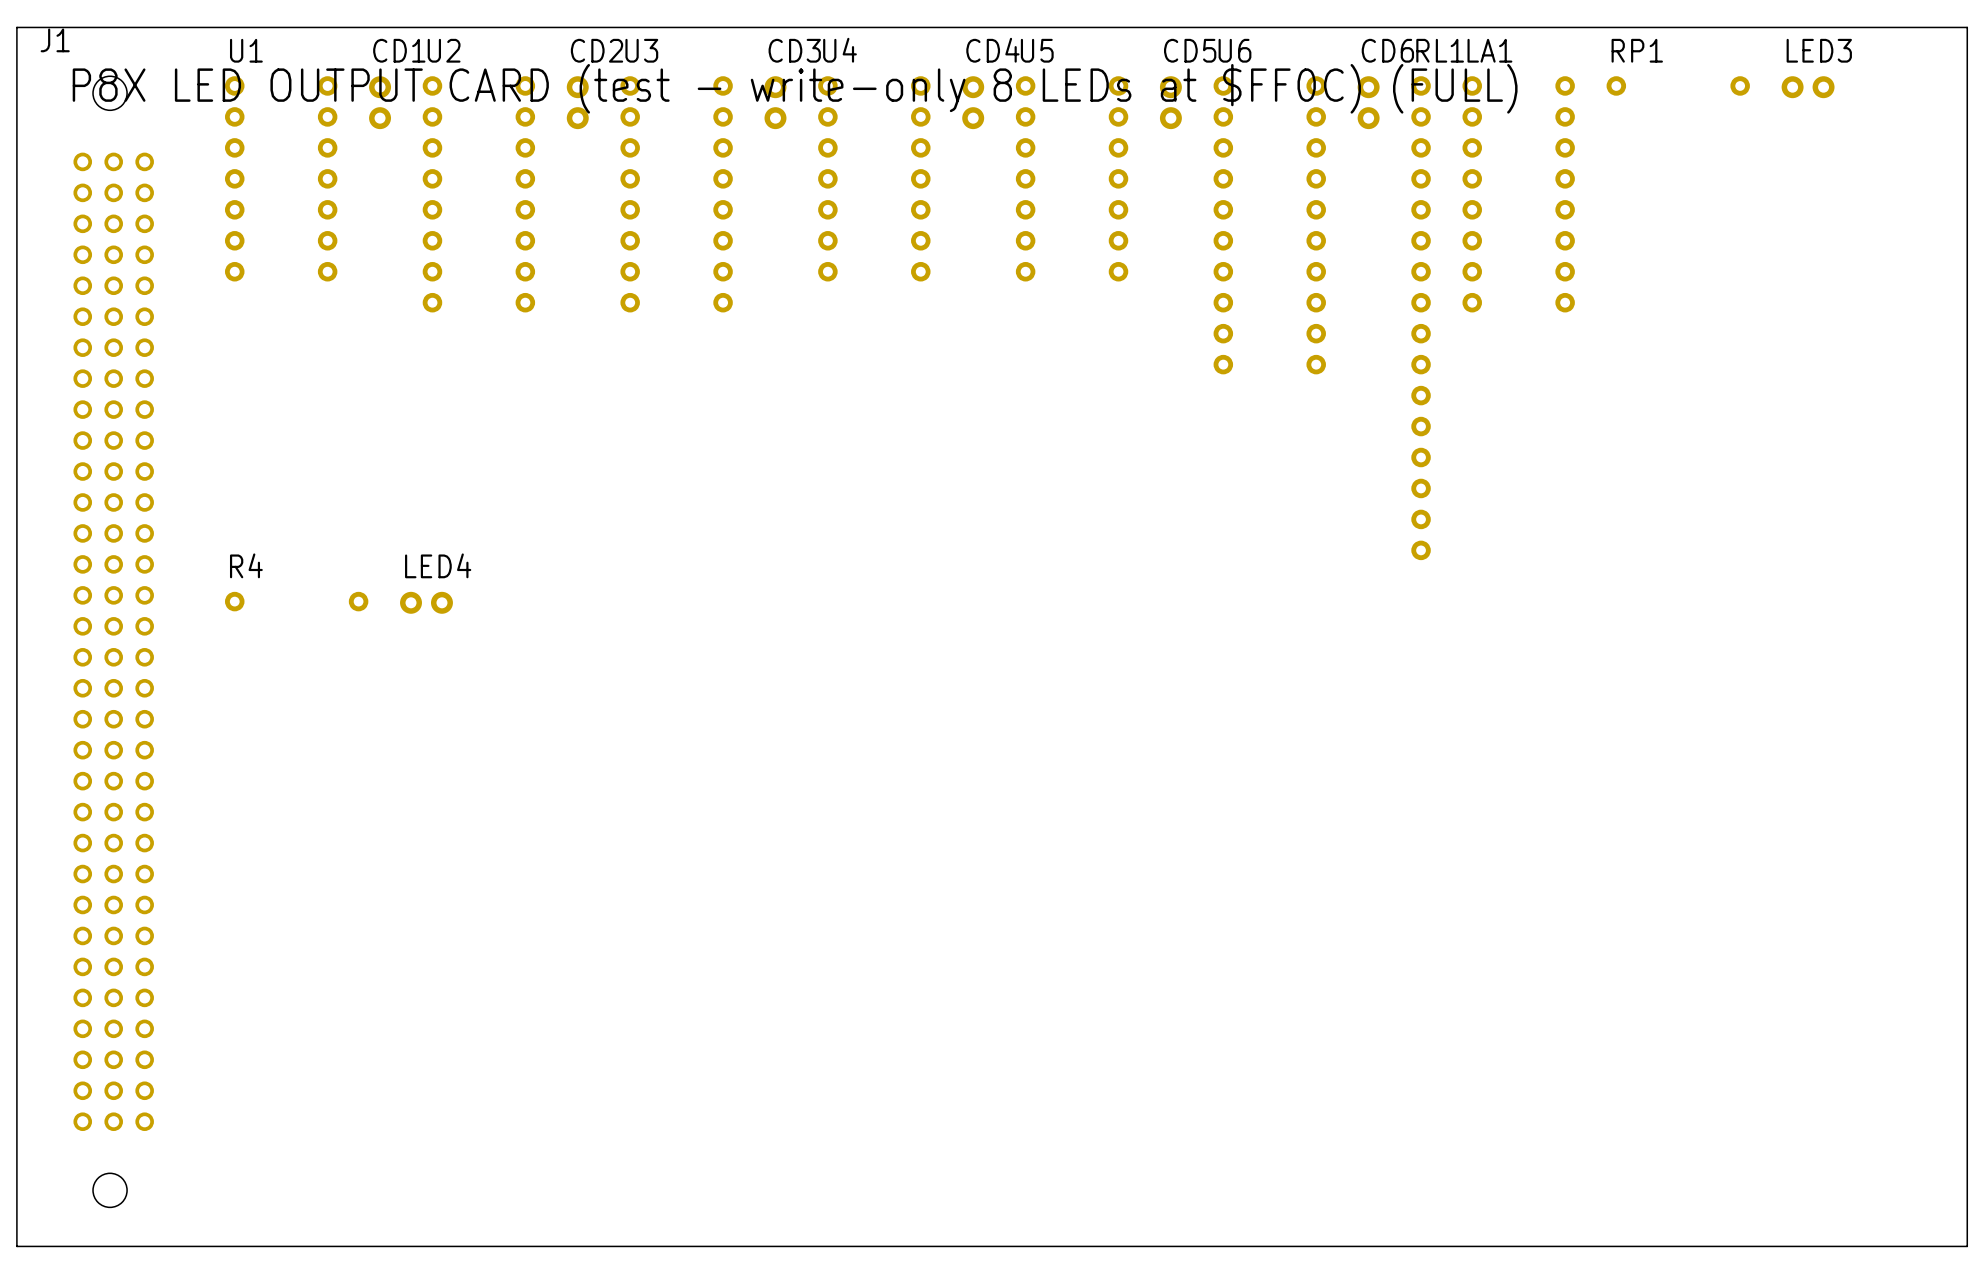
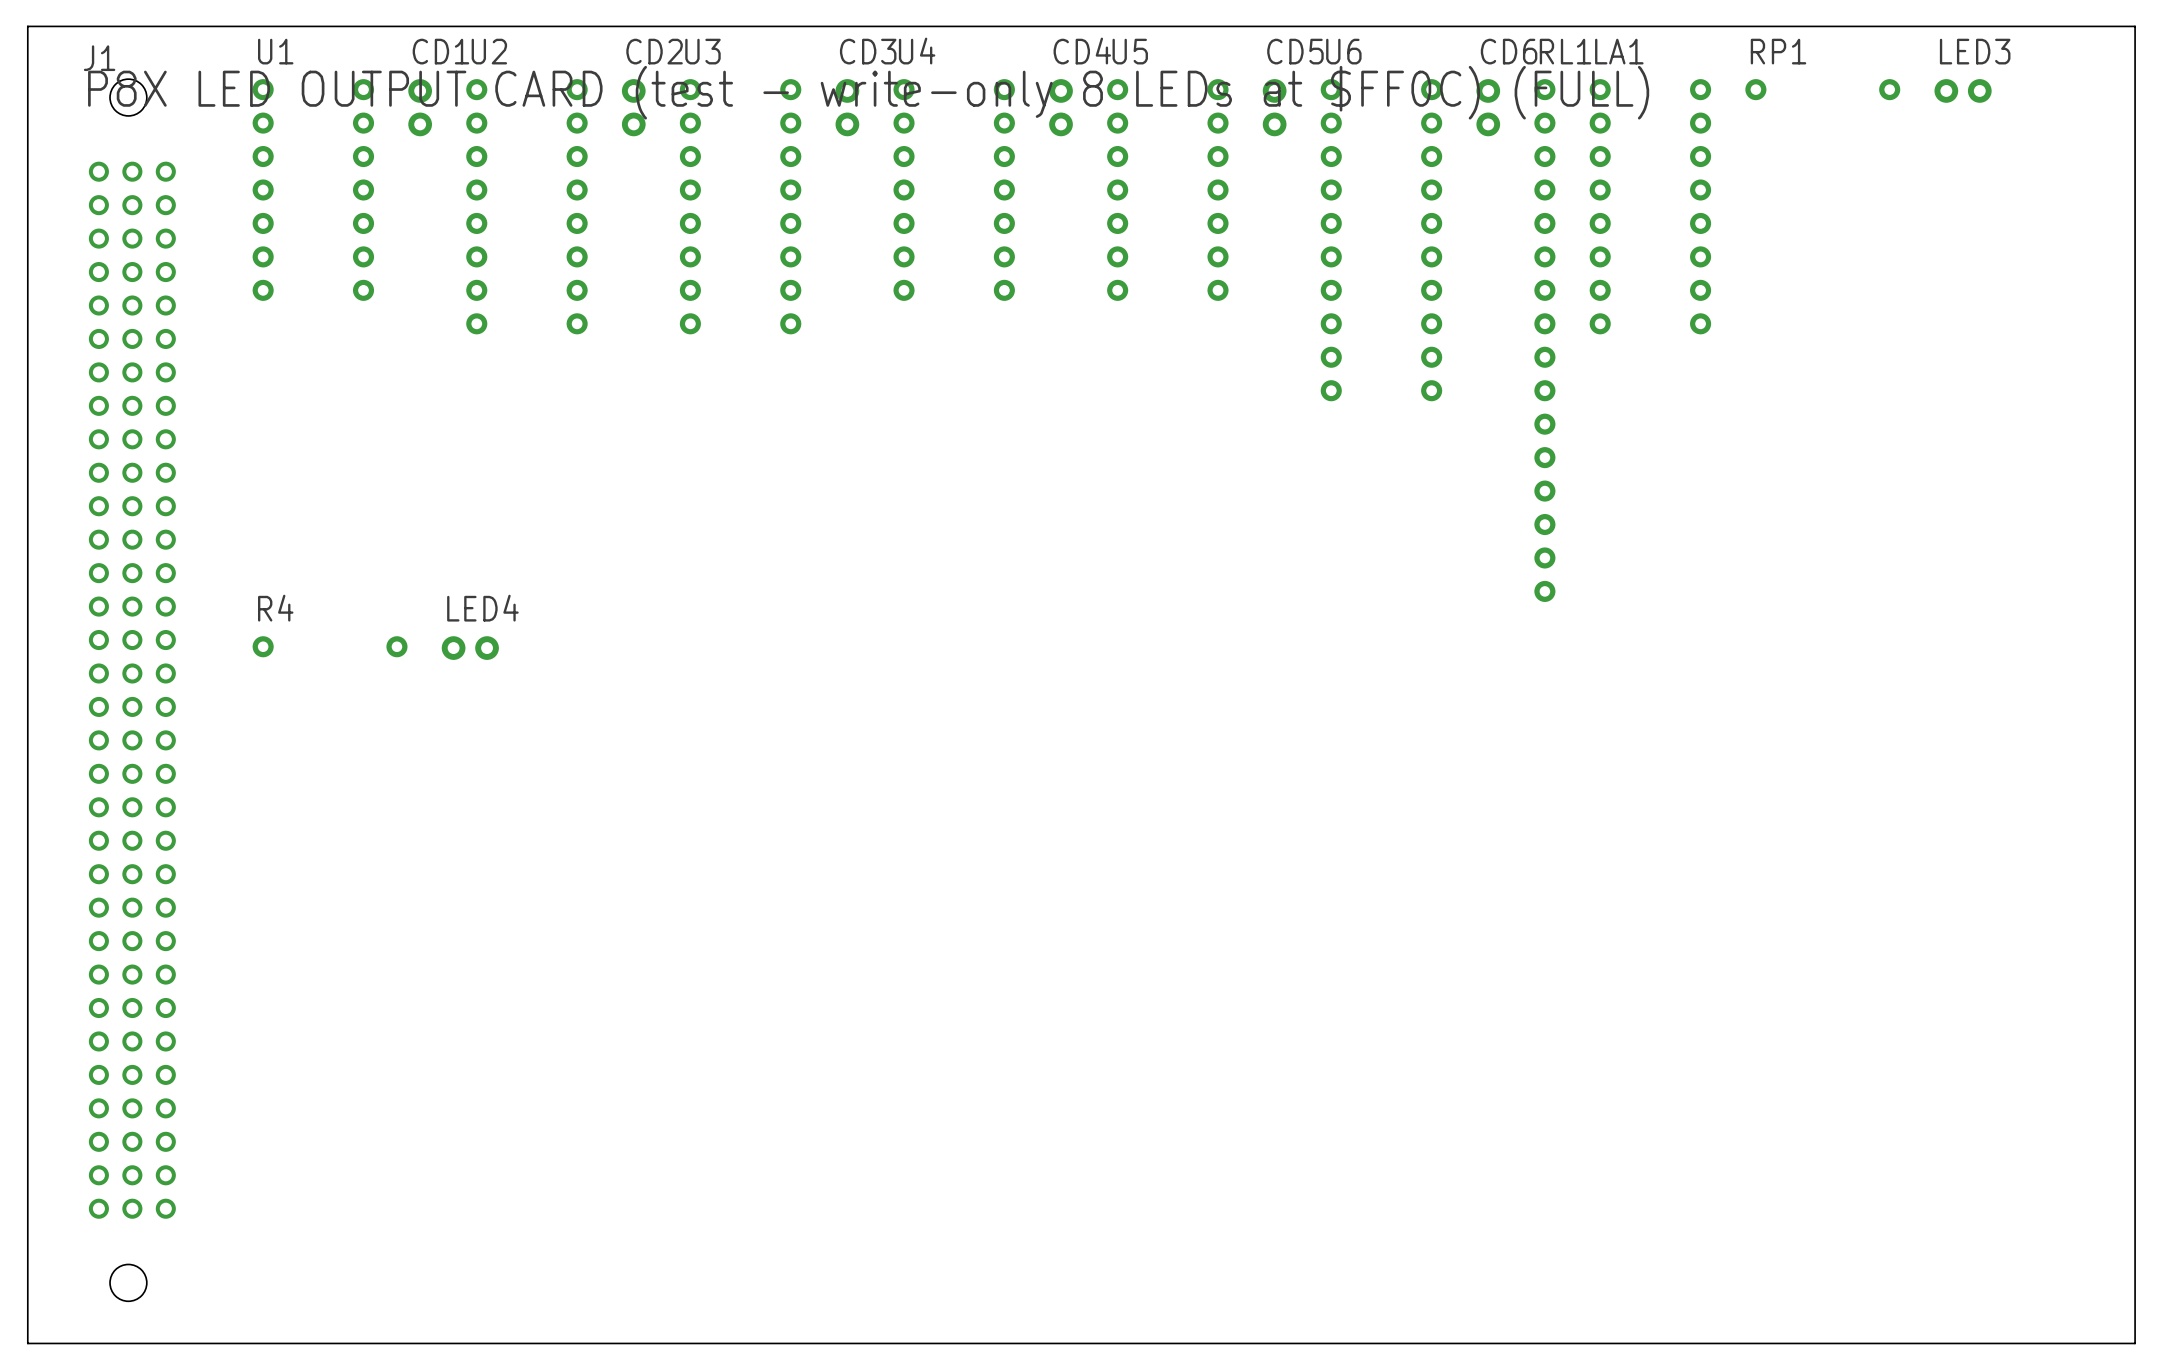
J1 name position: J1 (55, 40) -> J1 (99, 58)

